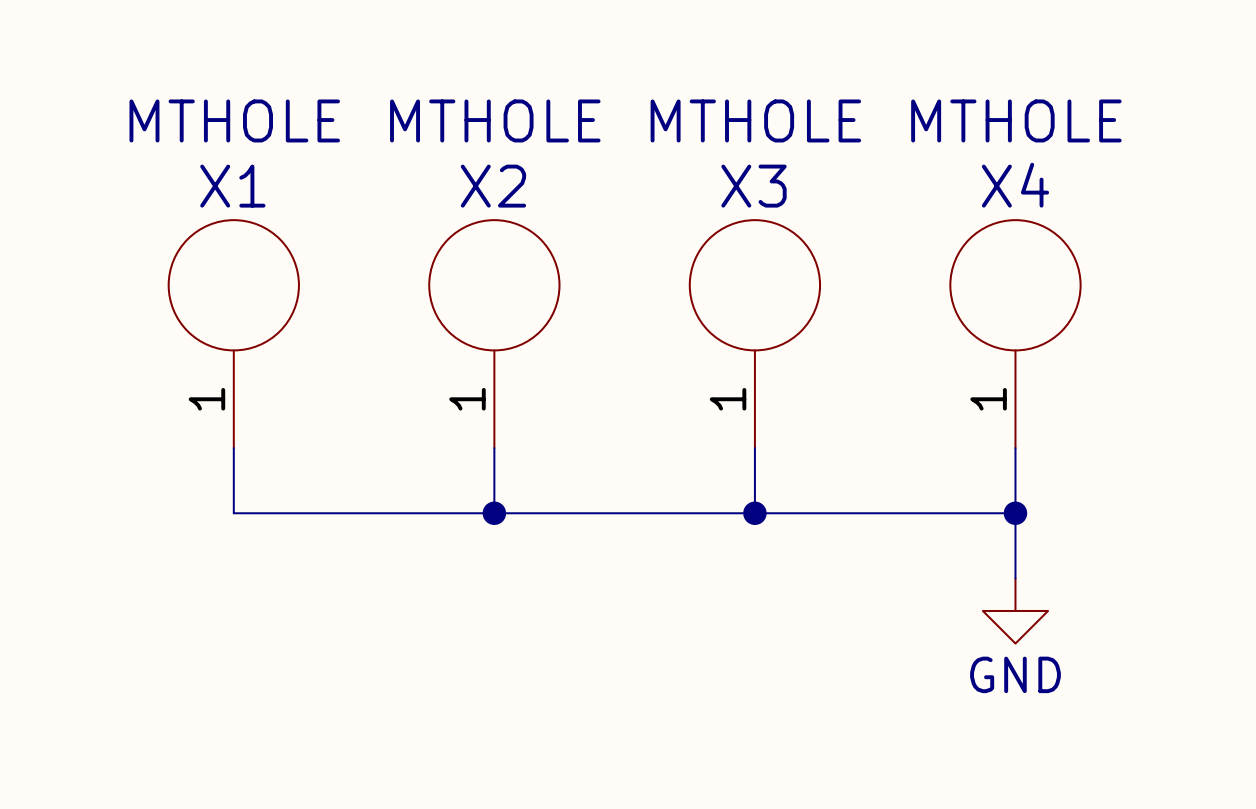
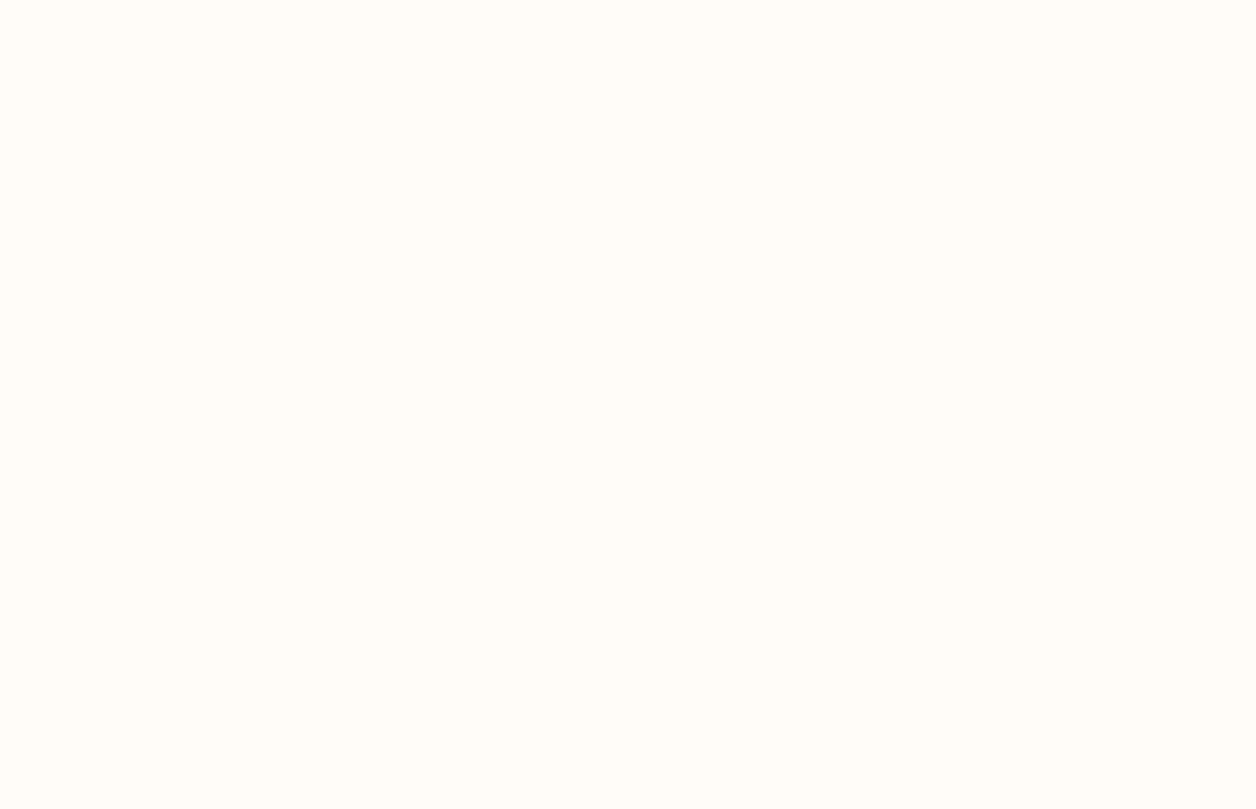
X1: MTHOLE (233, 334) -> none
X2: MTHOLE (494, 334) -> none
X3: MTHOLE (754, 334) -> none
X4: MTHOLE (1015, 334) -> none
wire: (233, 448) (233, 513) (1015, 513) -> none
wire: (494, 448) (494, 513) -> none
wire: (754, 448) (754, 513) -> none
wire: (1015, 448) (1015, 578) -> none
junction: (494, 513) -> none
junction: (754, 513) -> none
junction: (1015, 513) -> none
power symbol: GND (1015, 610) -> none

